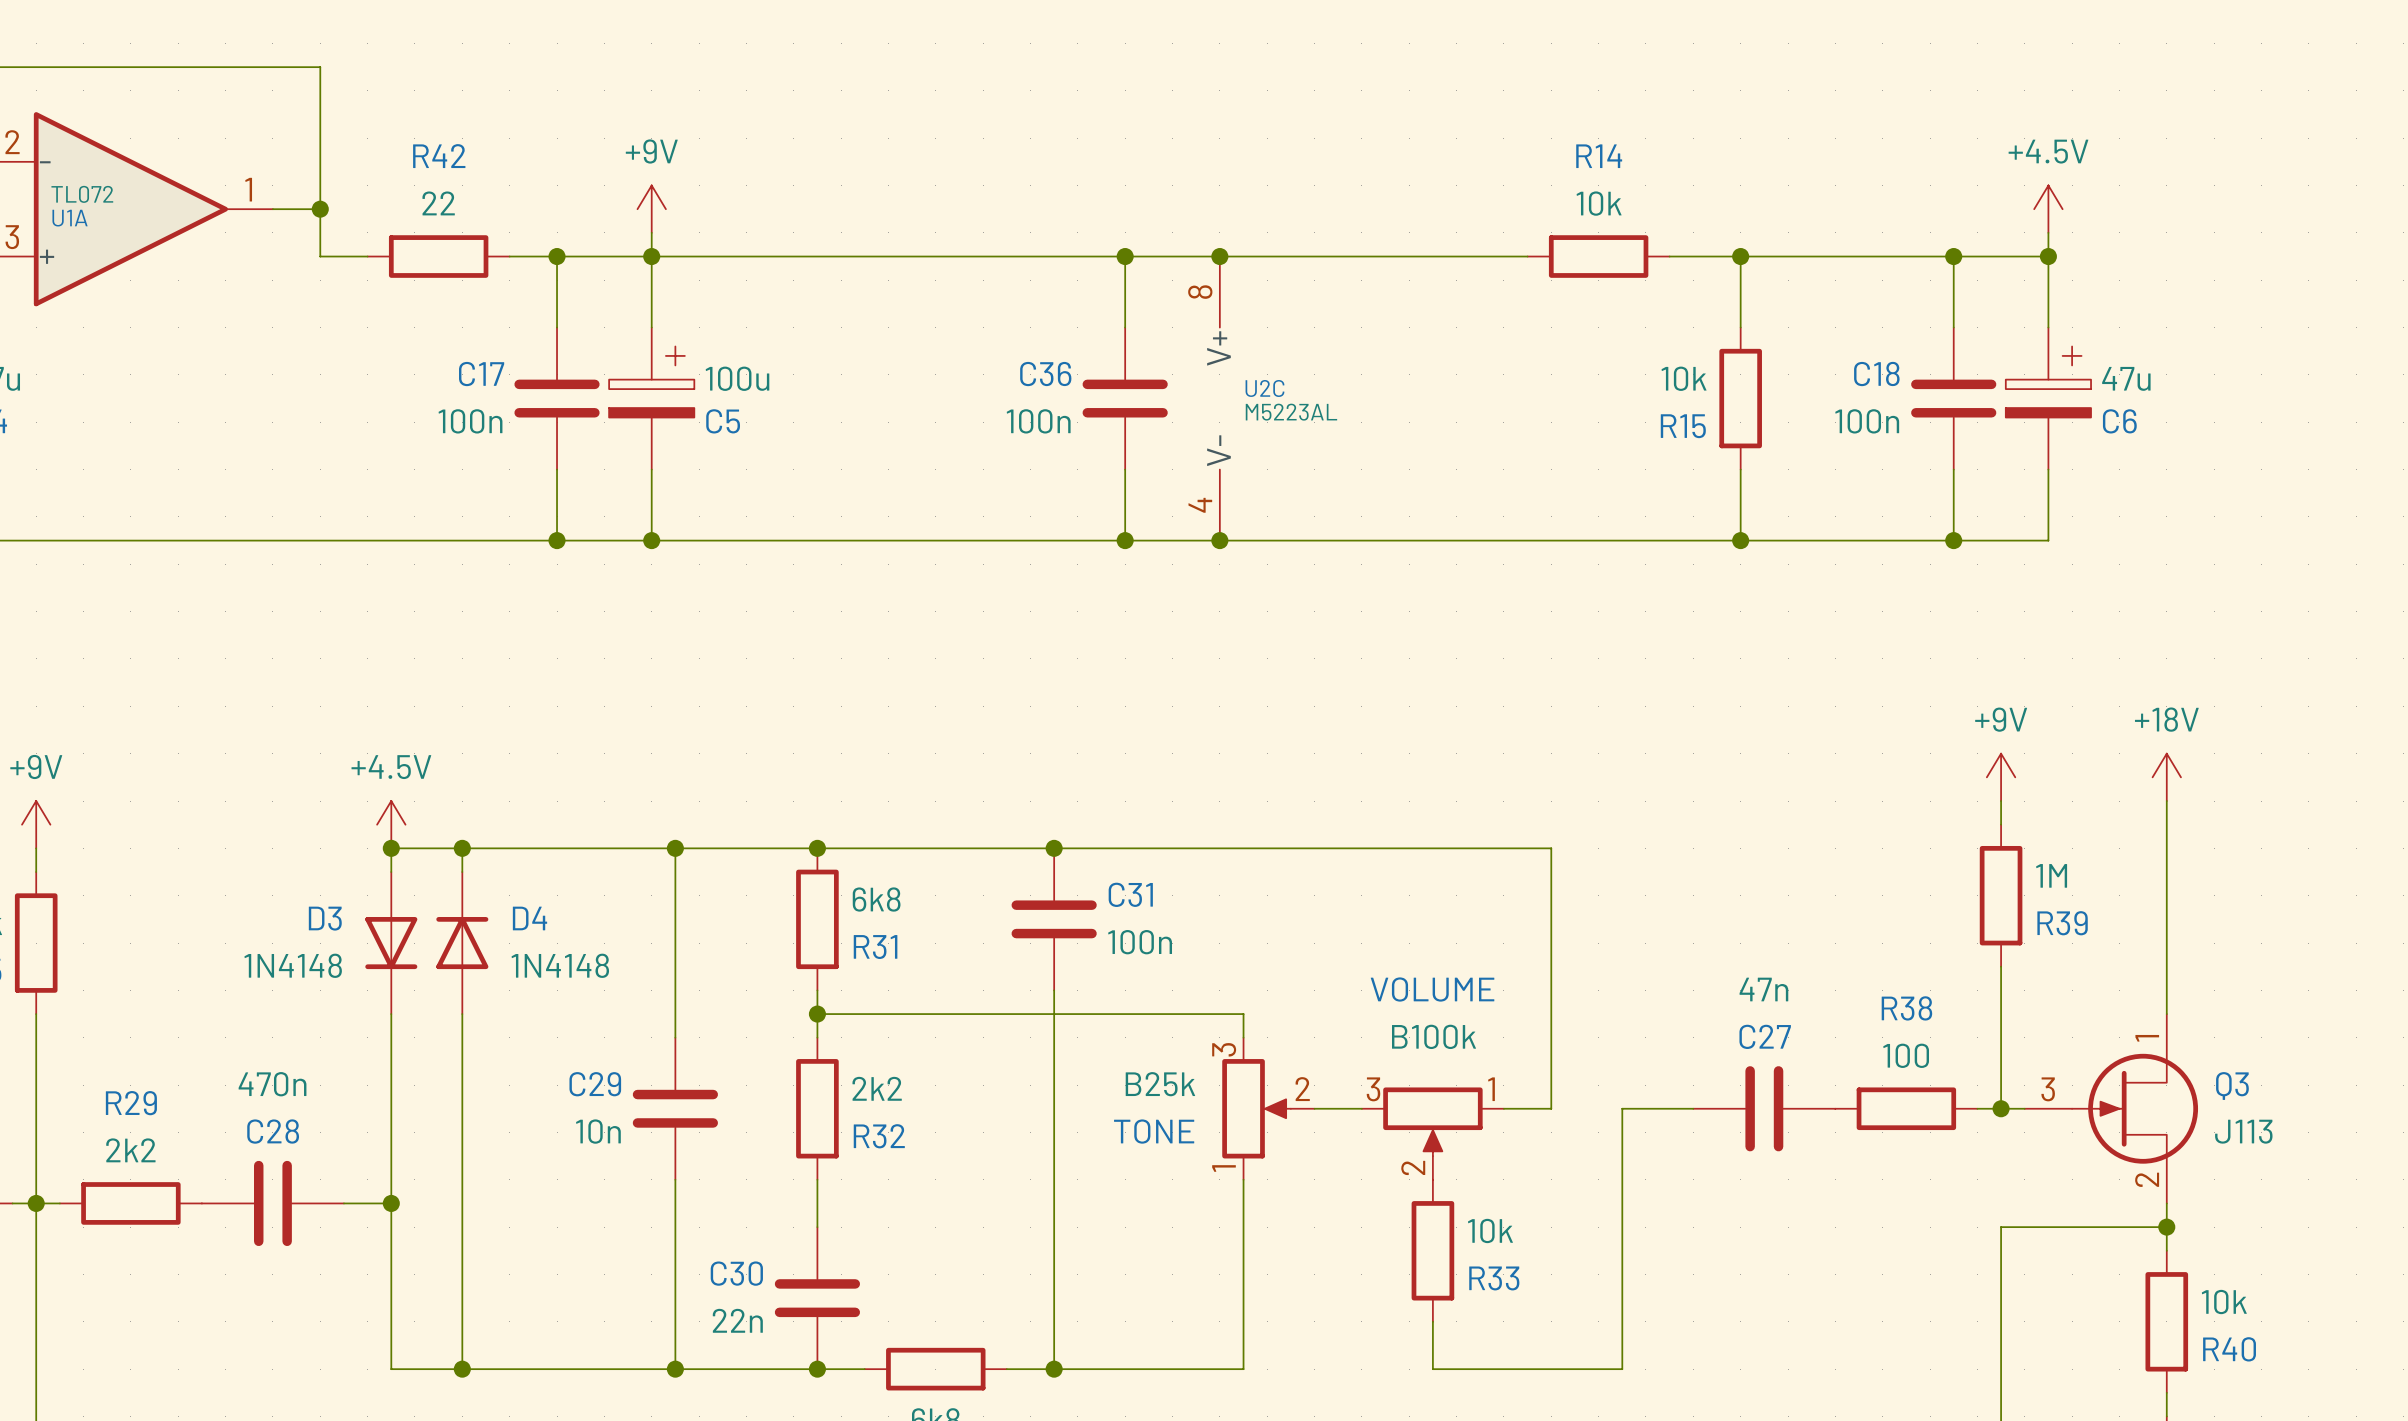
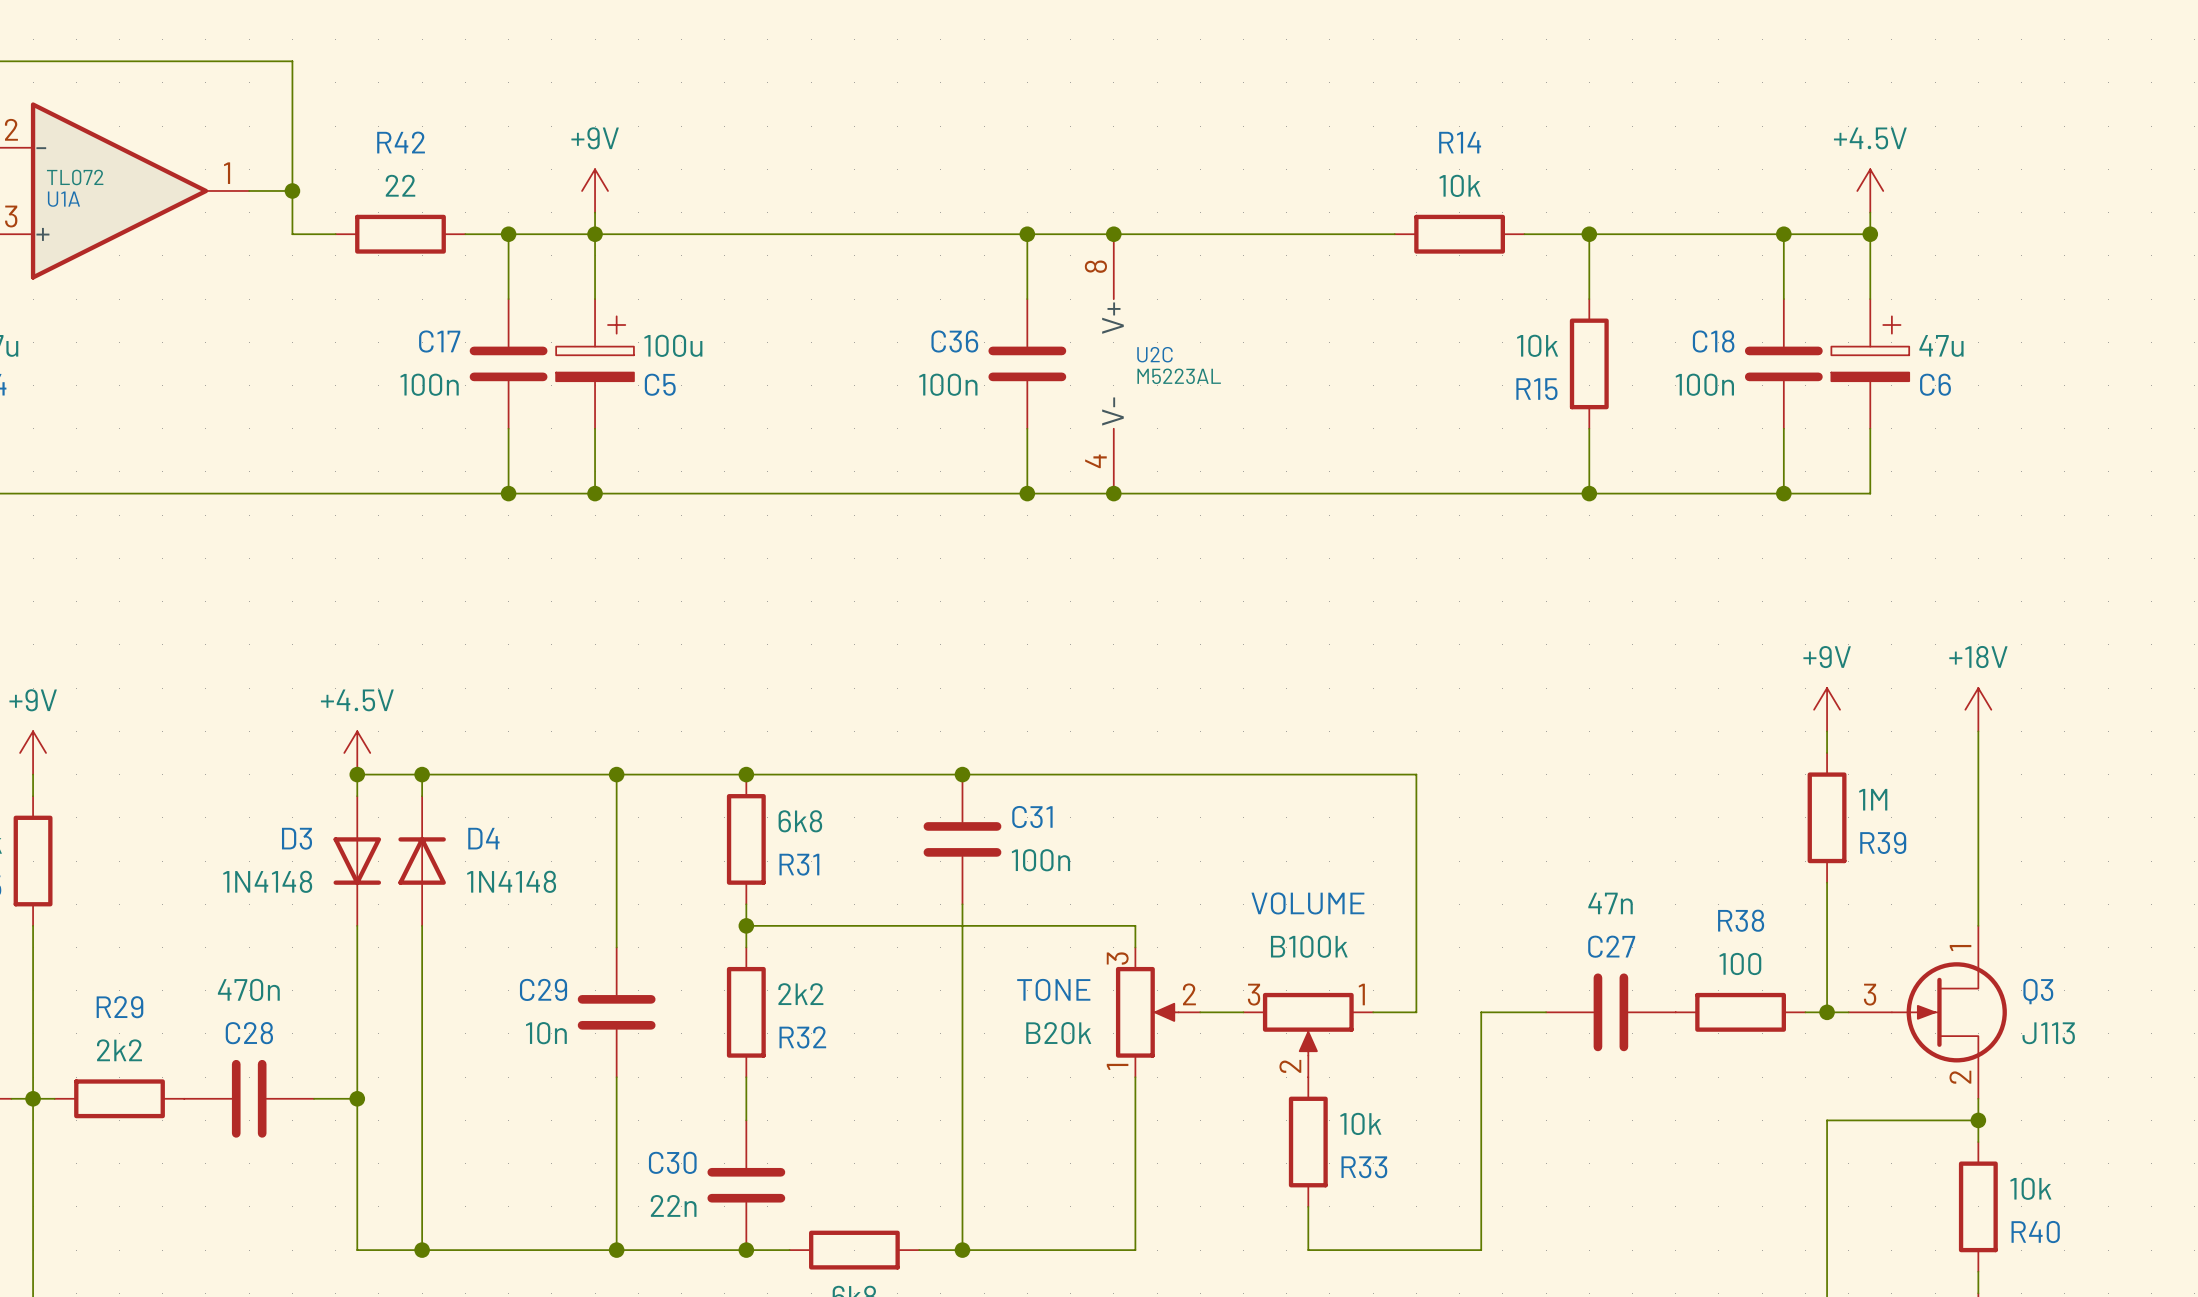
TONE value: B25k (1160, 1084) -> B20k (1058, 1033)
TONE name position: TONE (1154, 1131) -> TONE (1053, 989)

